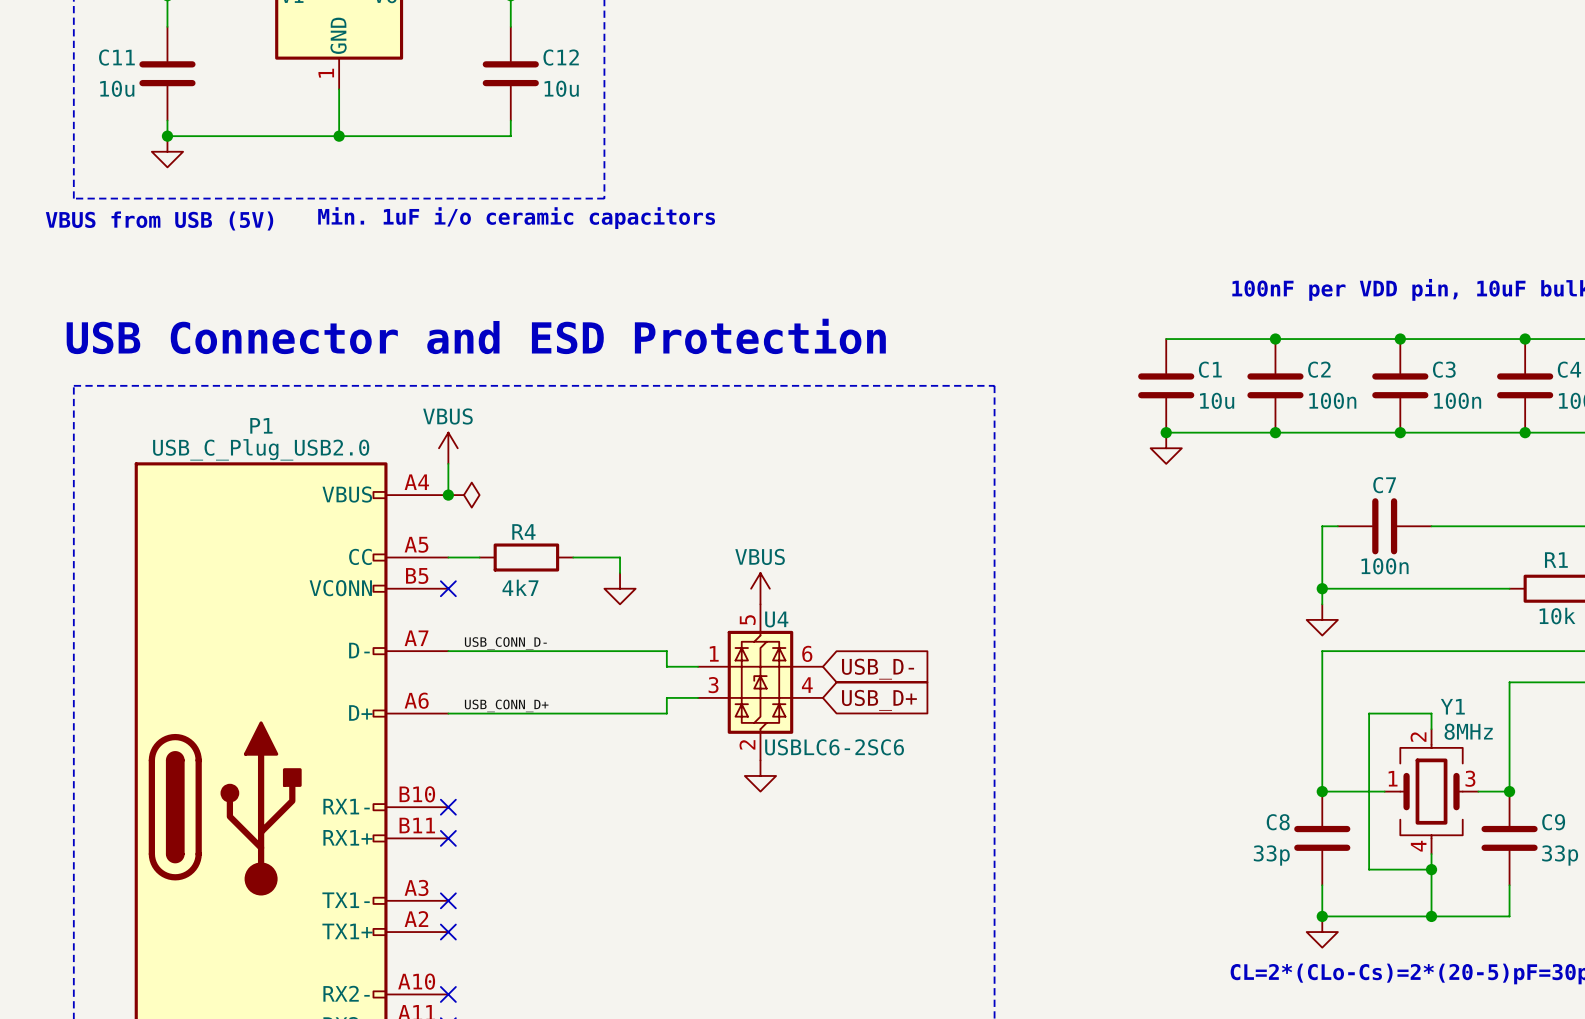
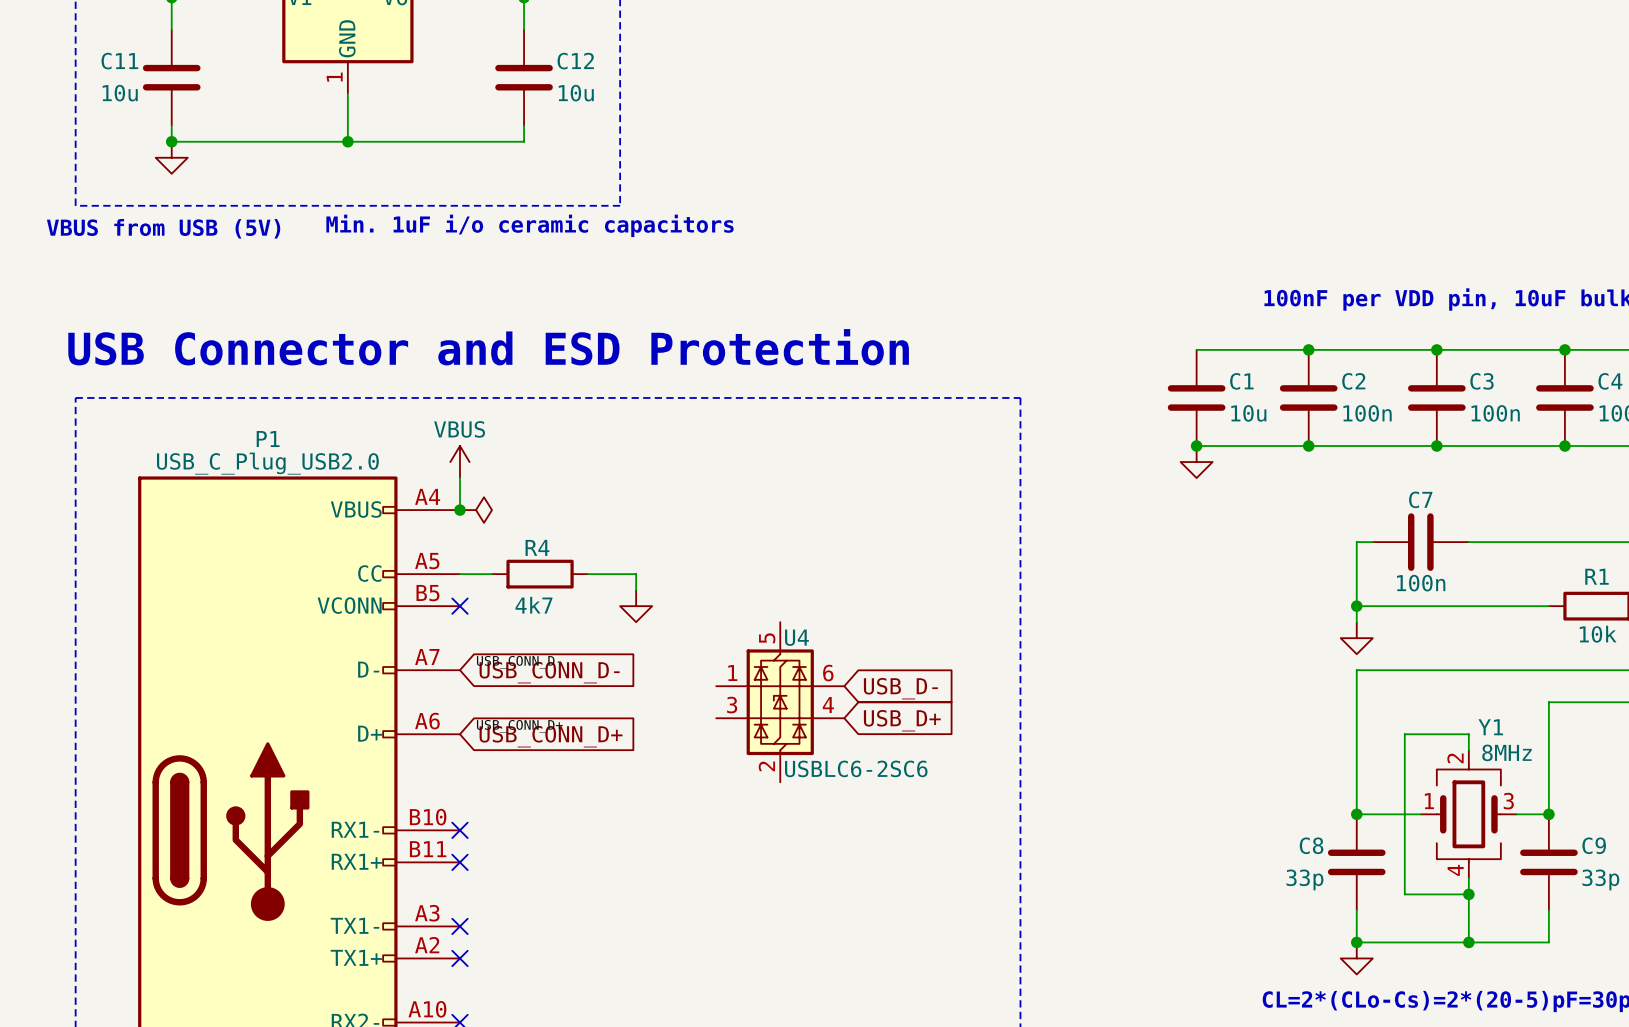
power symbol: VBUS (760, 588) -> none
wire: (448, 651) (666, 651) (666, 666) (698, 666) -> none
global label: none -> USB_CONN_D- (549, 672)
wire: (698, 697) (666, 697) (666, 713) (448, 713) -> none
global label: none -> USB_CONN_D+ (551, 736)
power symbol: (760, 775) -> none

